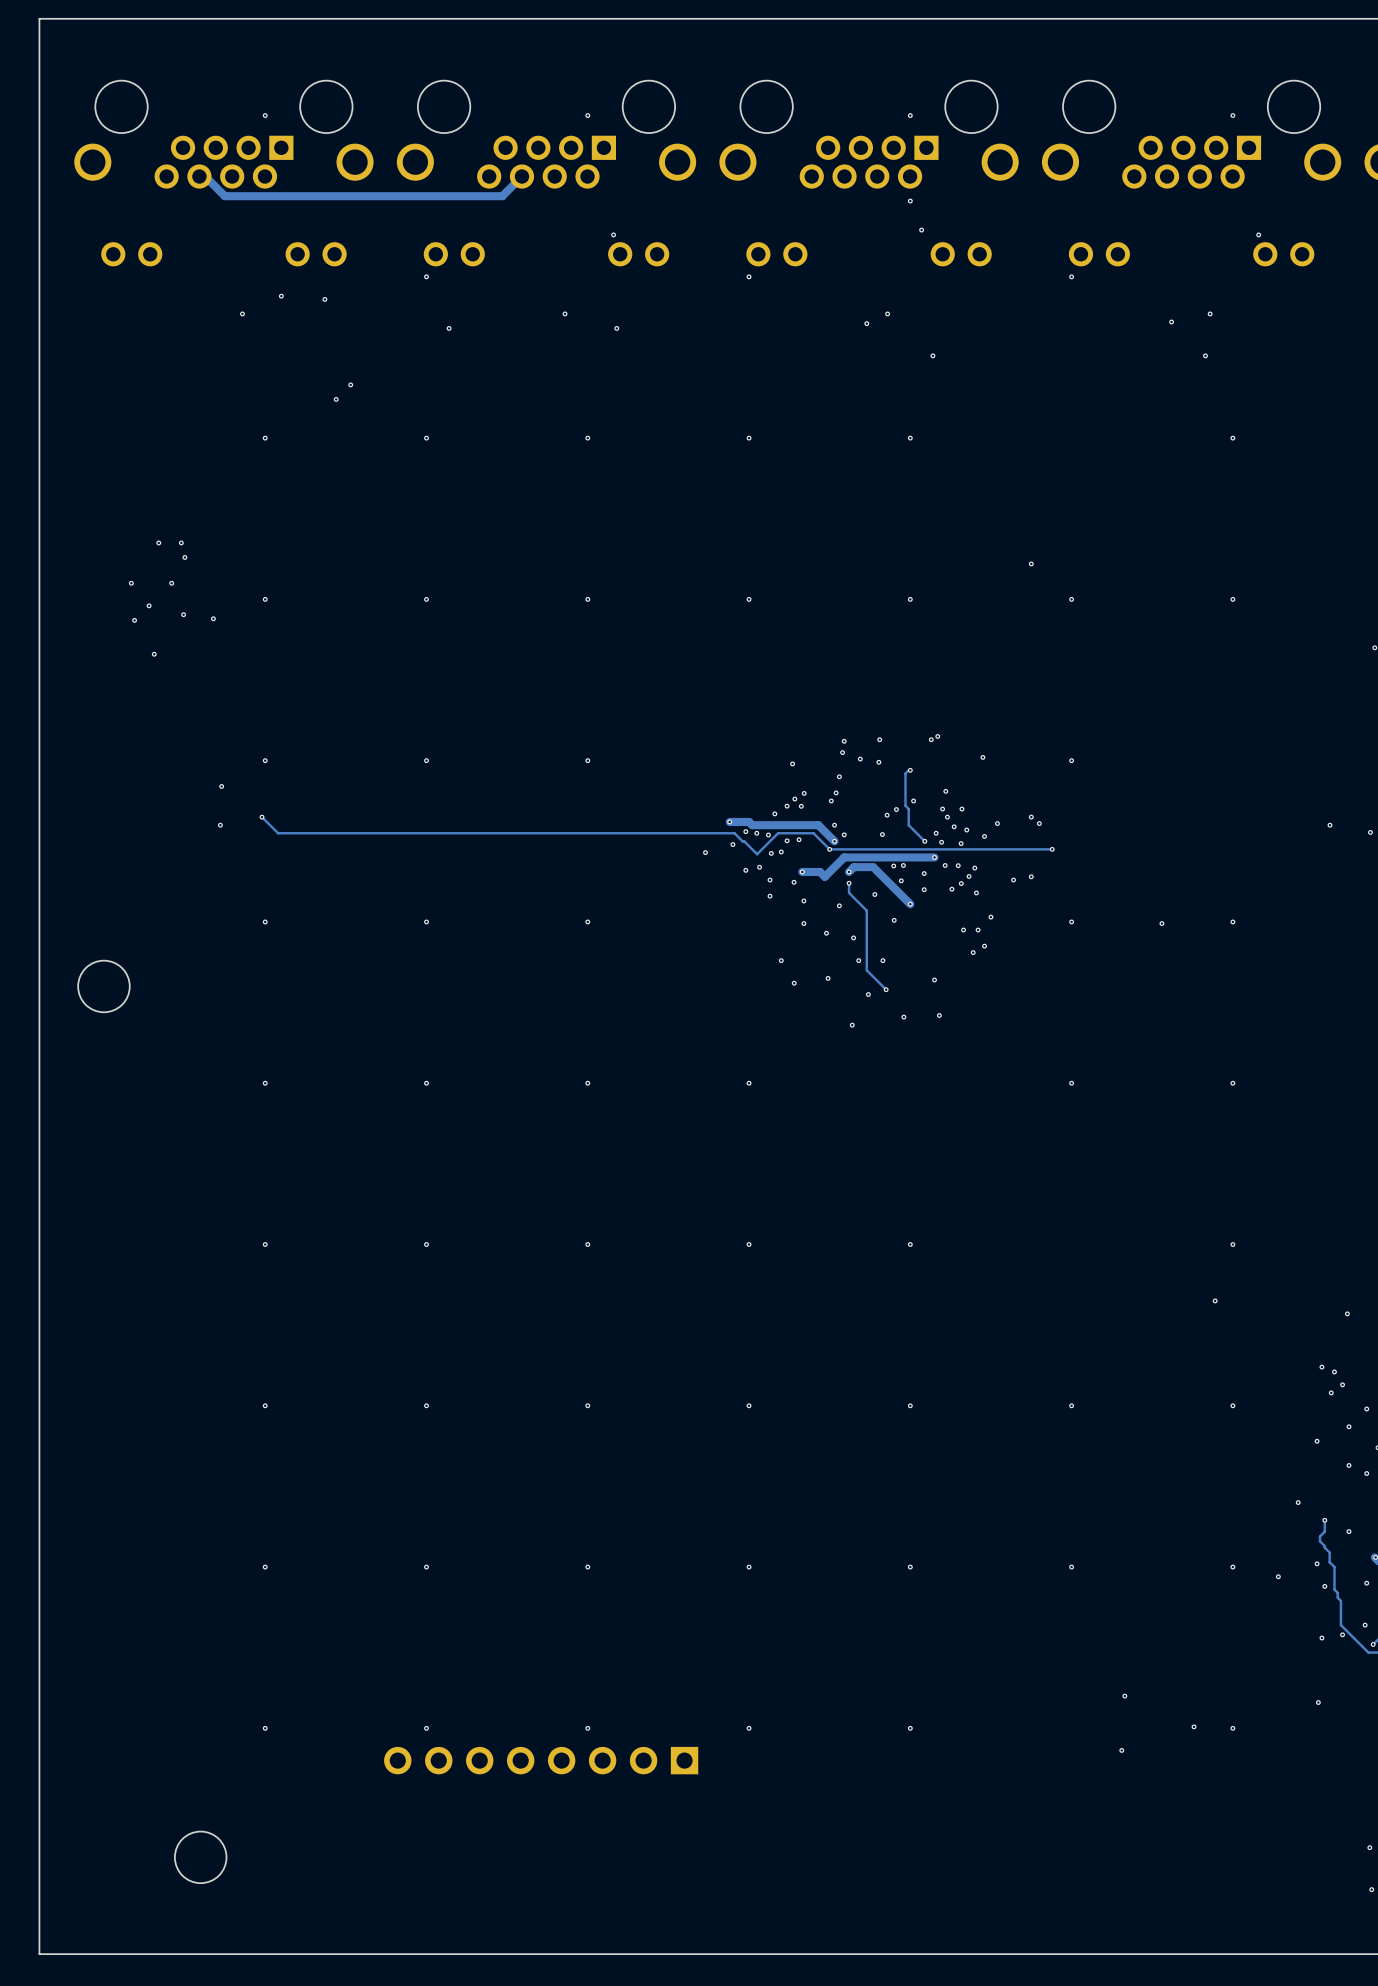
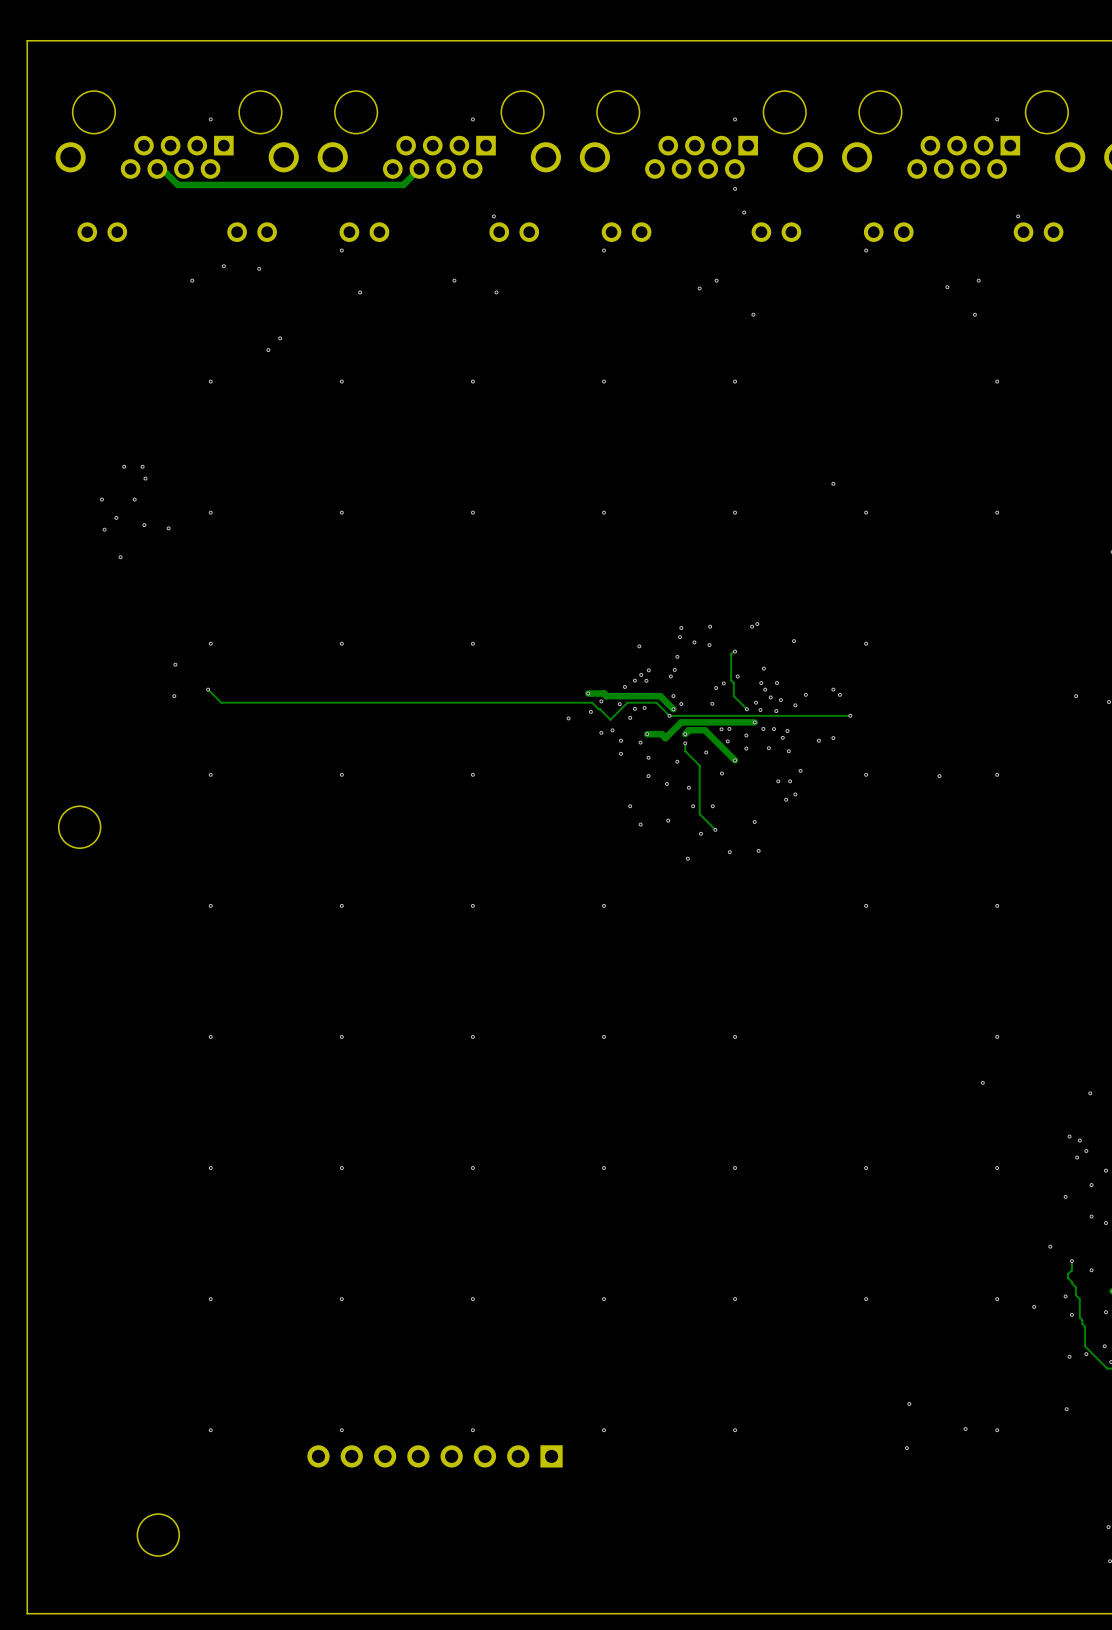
via: (756, 833) -> none
via: (771, 853) -> none
via: (961, 883) -> none

